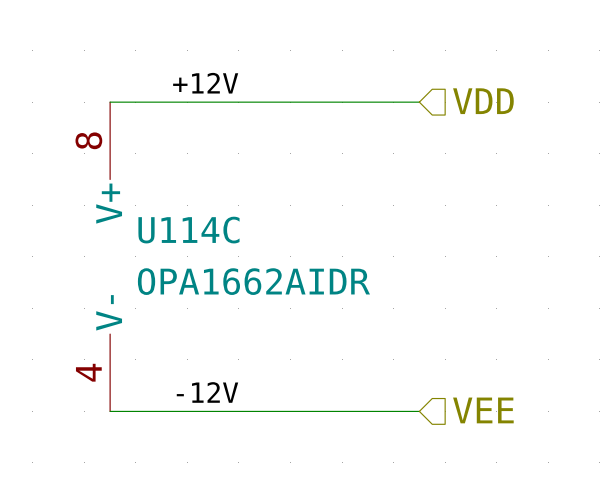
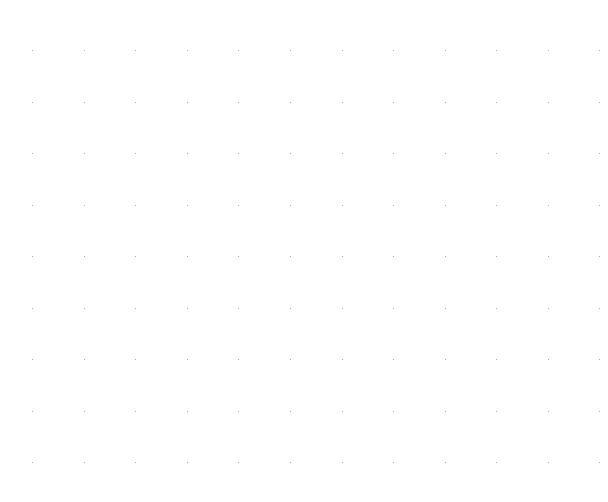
label: +12V (205, 83) -> none
hierarchical label: VDD (483, 101) -> none
wire: (110, 102) (419, 102) -> none
U114C: OPA1662AIDR (110, 256) -> none
label: -12V (207, 392) -> none
hierarchical label: VEE (483, 410) -> none
wire: (110, 411) (419, 411) -> none

